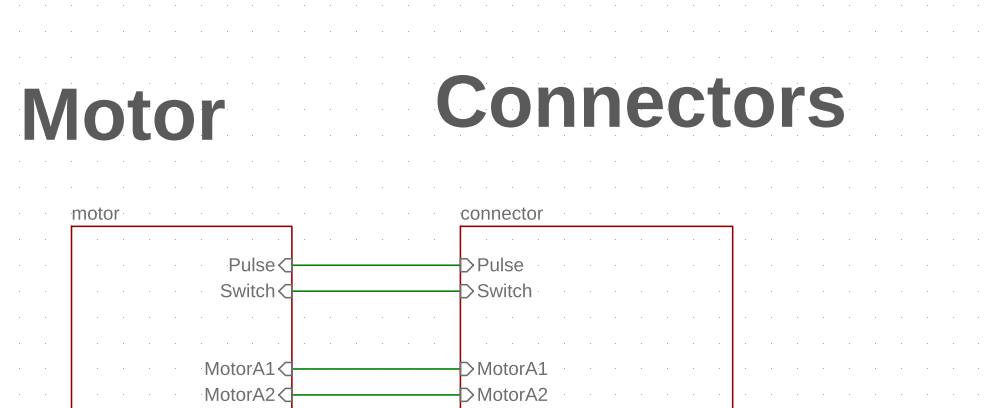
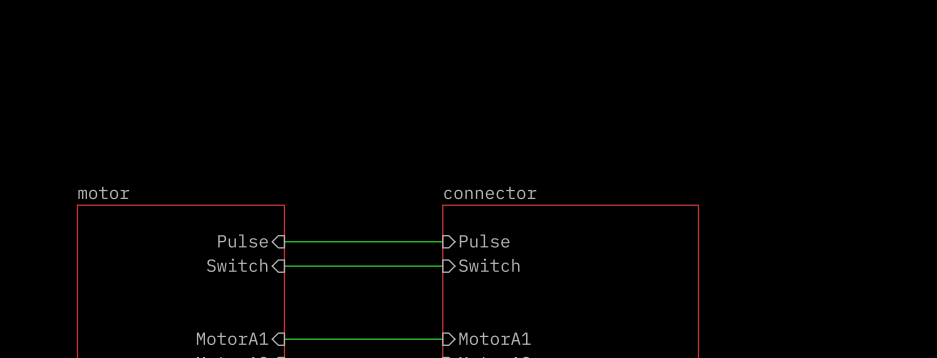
text: Connectors (640, 101) -> none
text: Motor (124, 114) -> none

